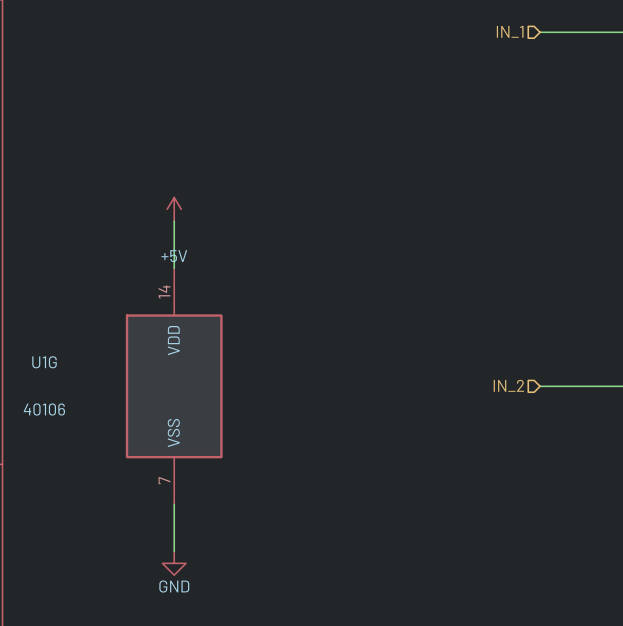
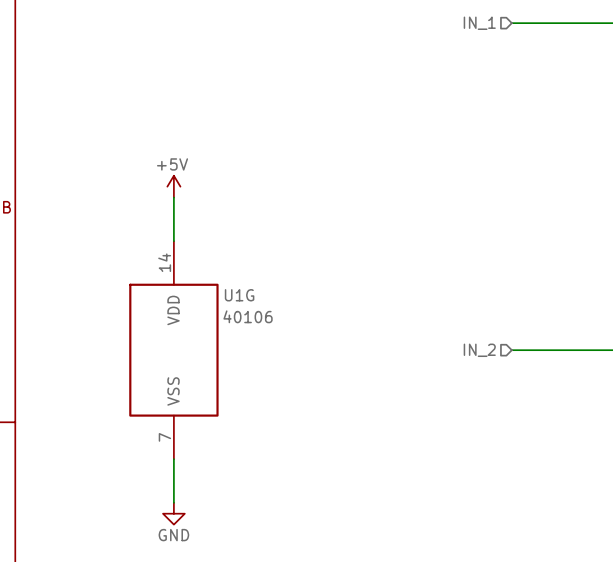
power symbol text position: +5V (174, 256) -> +5V (172, 164)
U1G name position: U1G (44, 362) -> U1G (239, 295)
U1G value position: 40106 (44, 409) -> 40106 (248, 316)

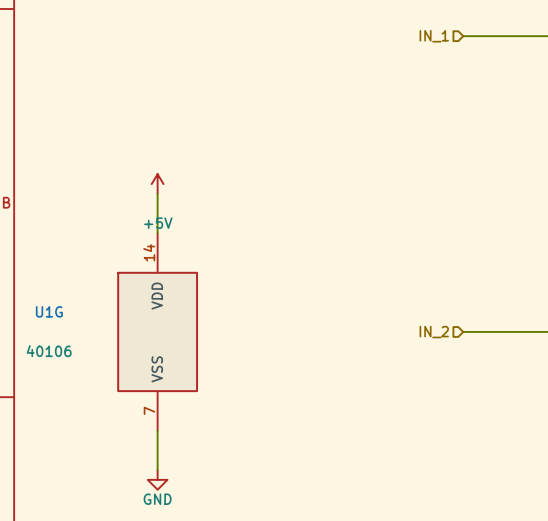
power symbol text position: +5V (172, 164) -> +5V (158, 223)
U1G name position: U1G (239, 295) -> U1G (49, 311)
U1G value position: 40106 (248, 316) -> 40106 (49, 351)

